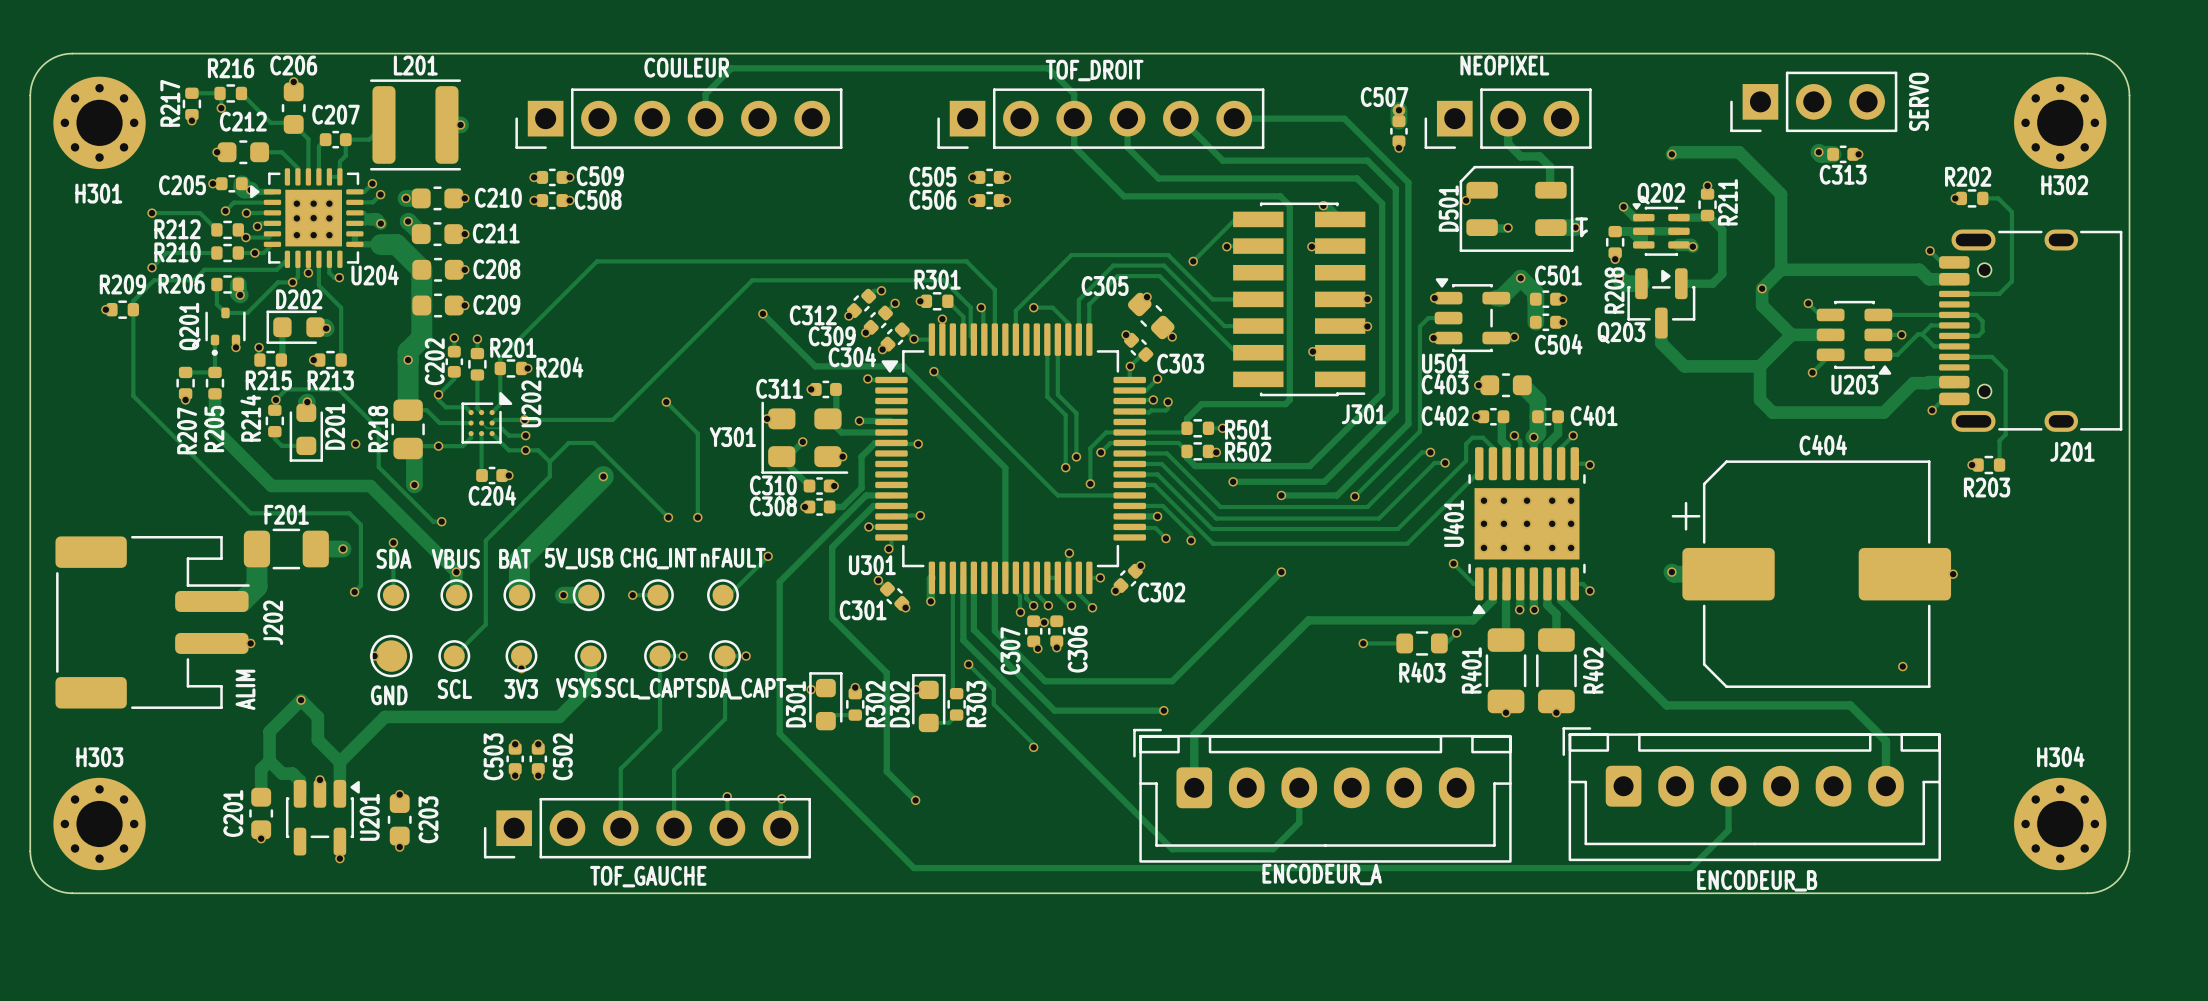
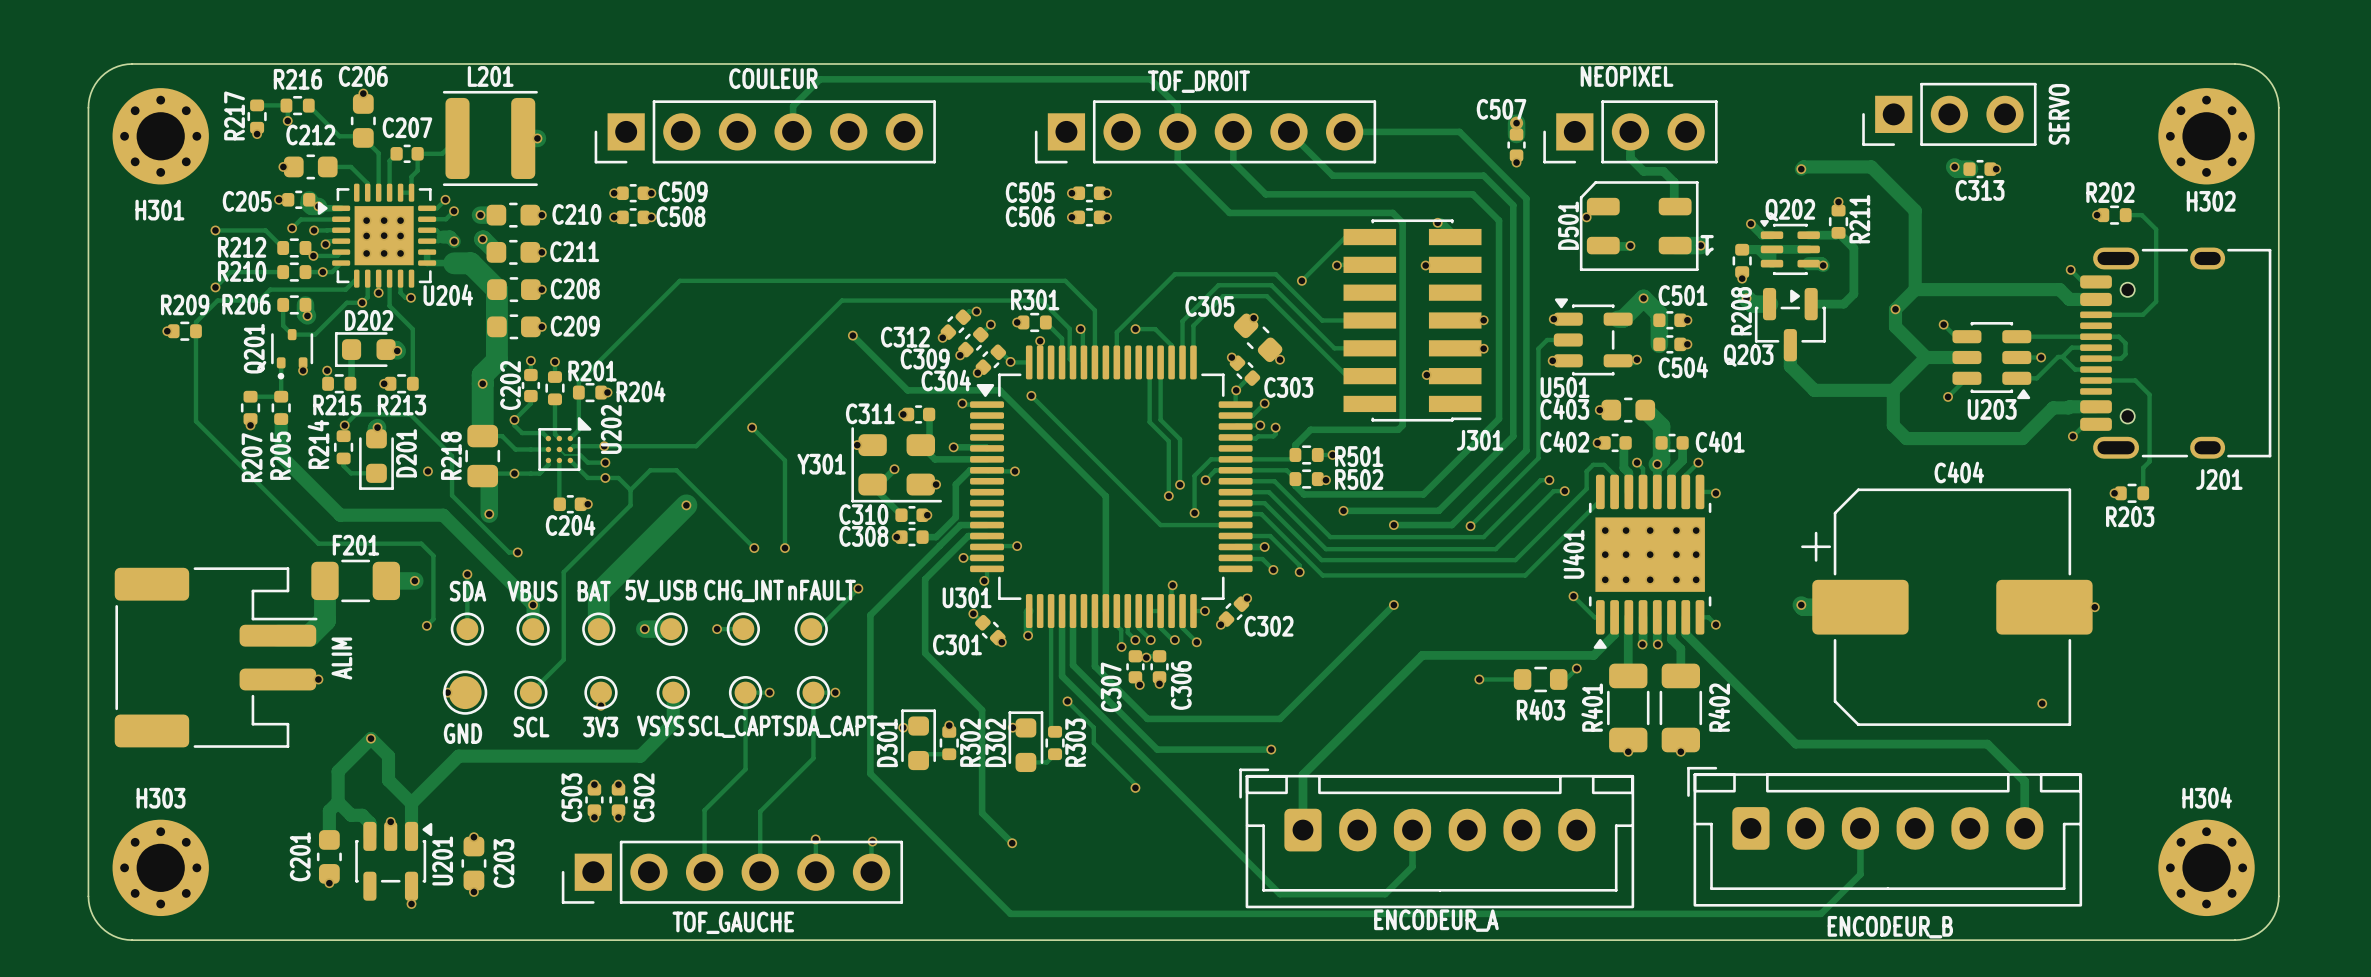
J202 name: J202 (273, 622) -> ALIM (341, 658)
text: ALIM (245, 689) -> none

